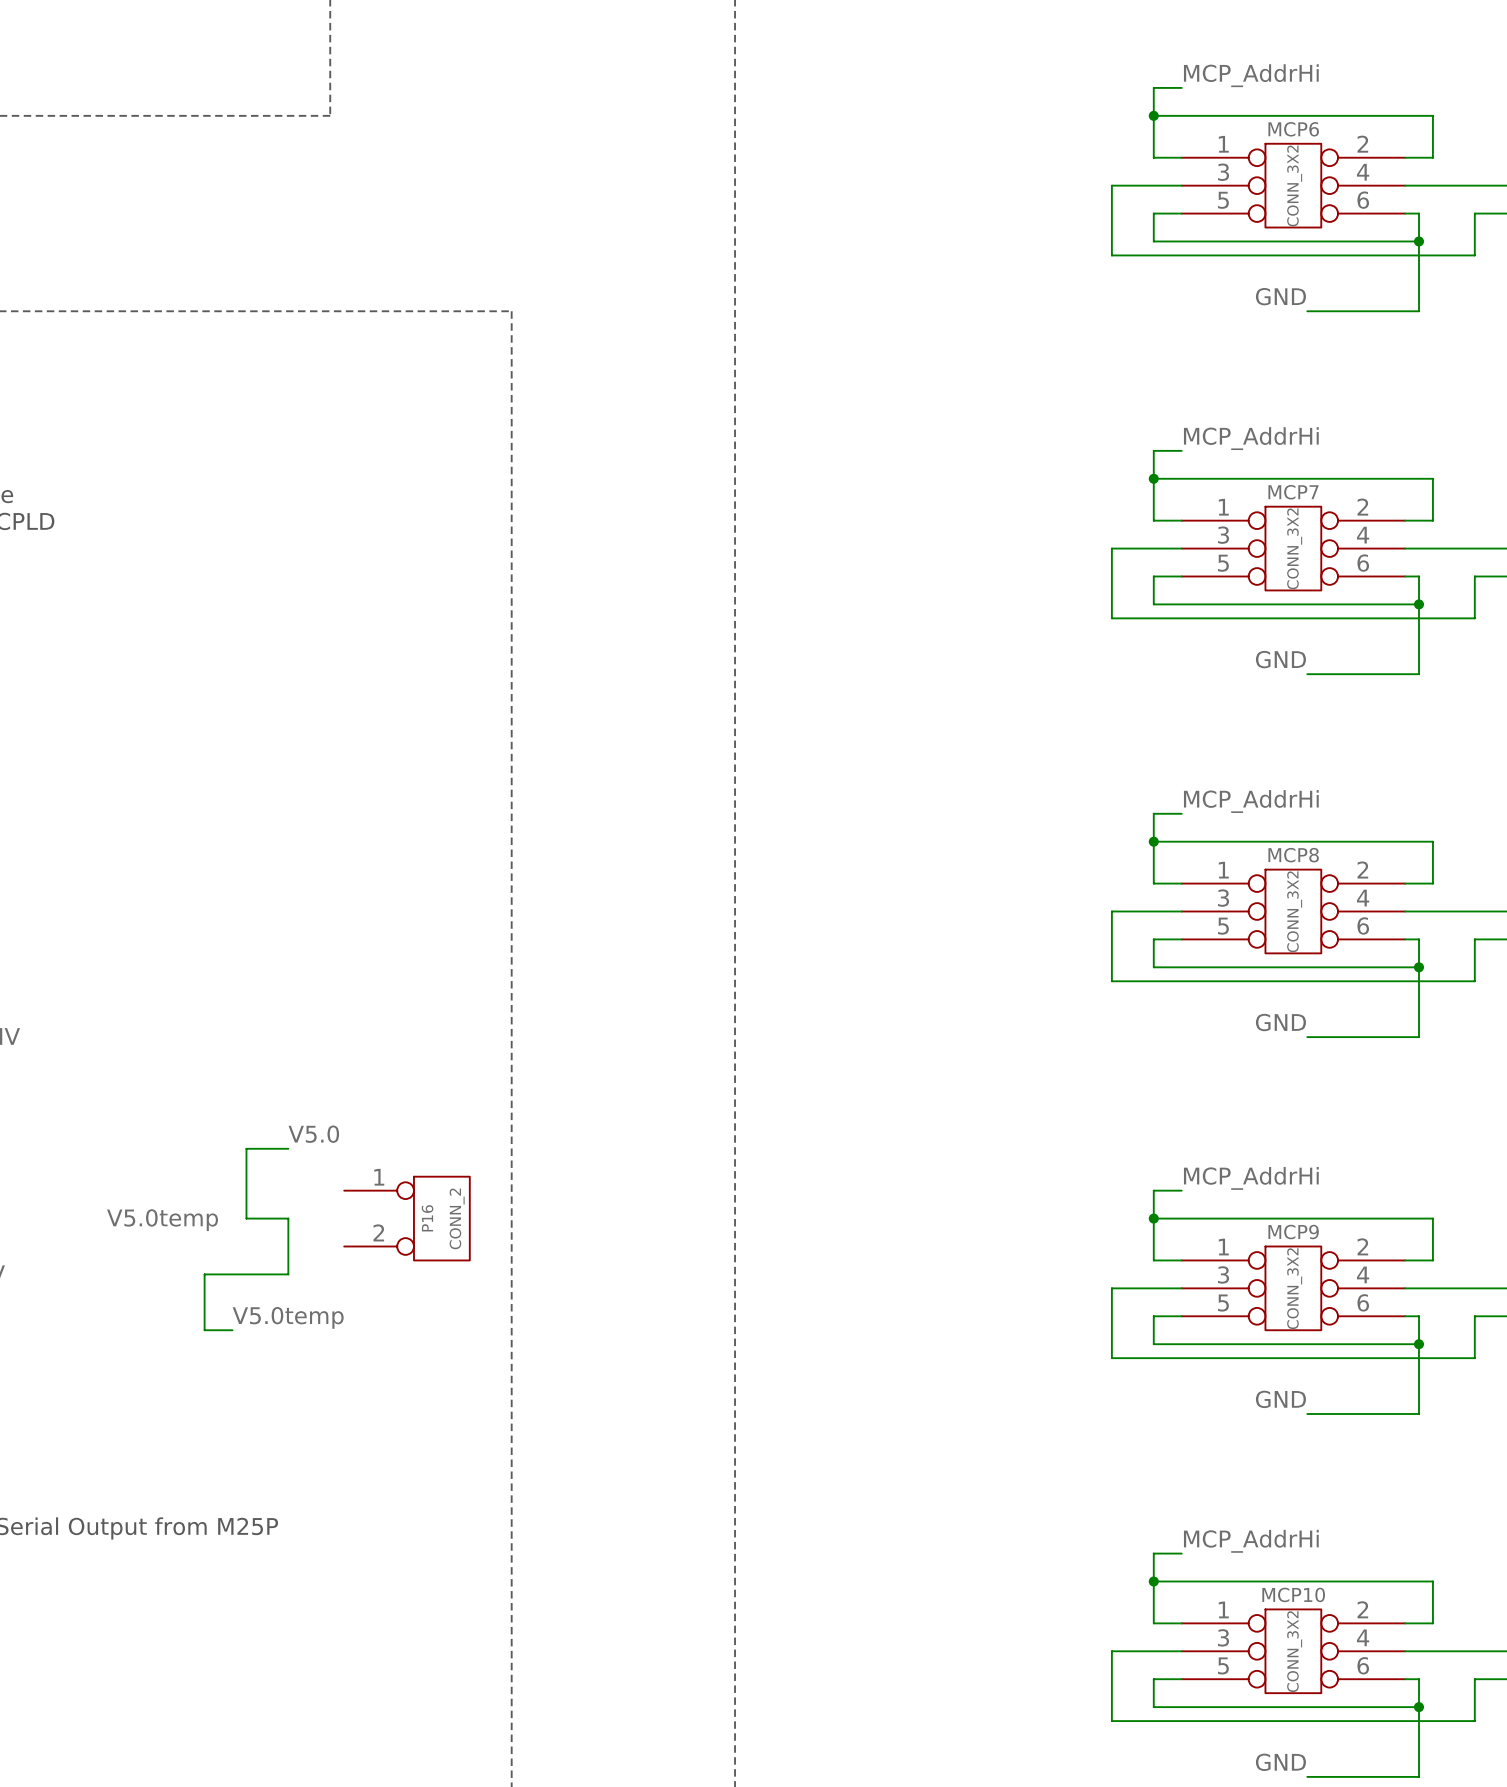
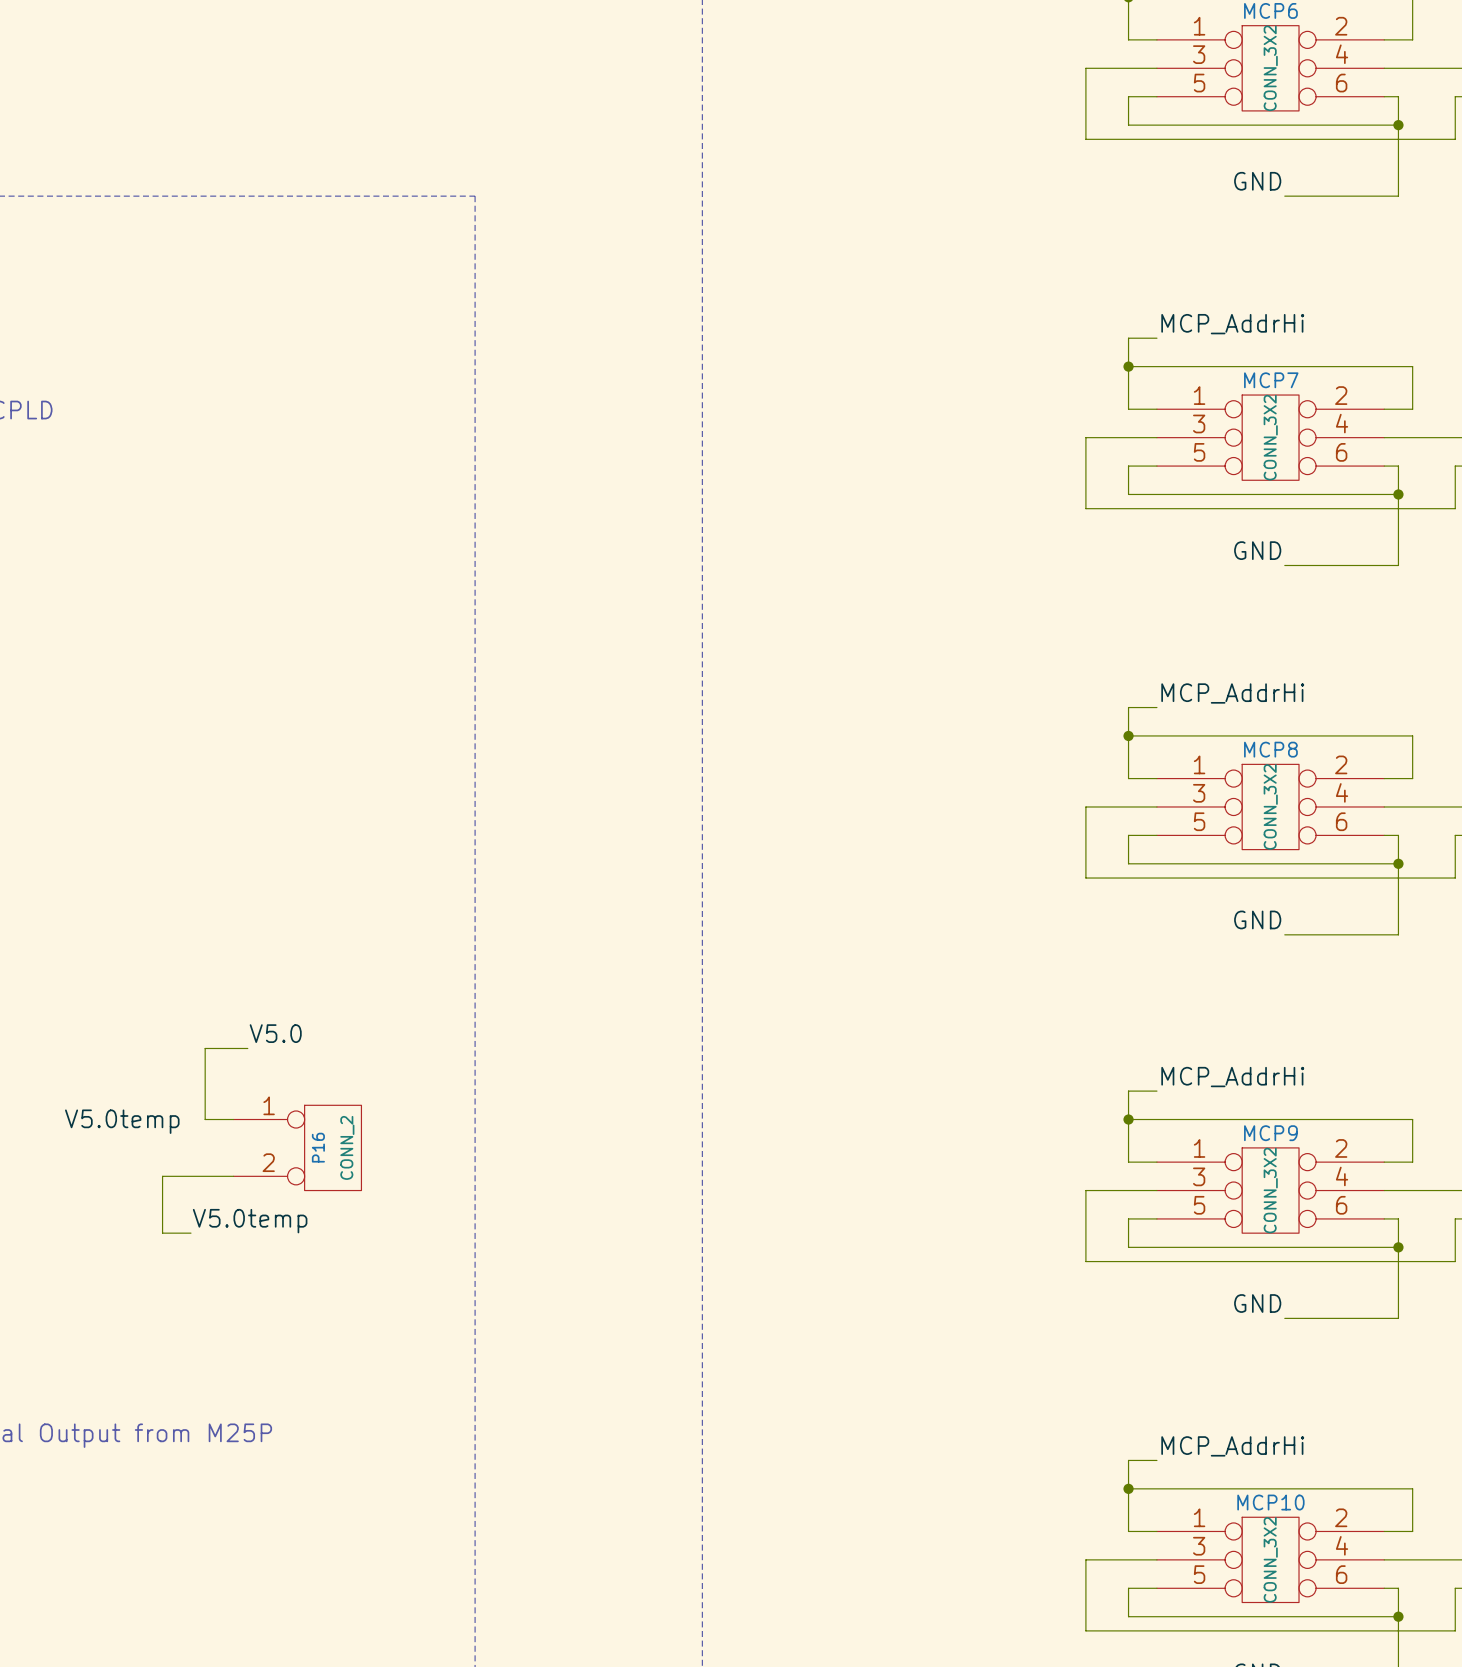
wire: (274, 1218) (288, 1218) (288, 1274) (274, 1274) -> none
P16 position: (407, 1218) -> (297, 1147)

